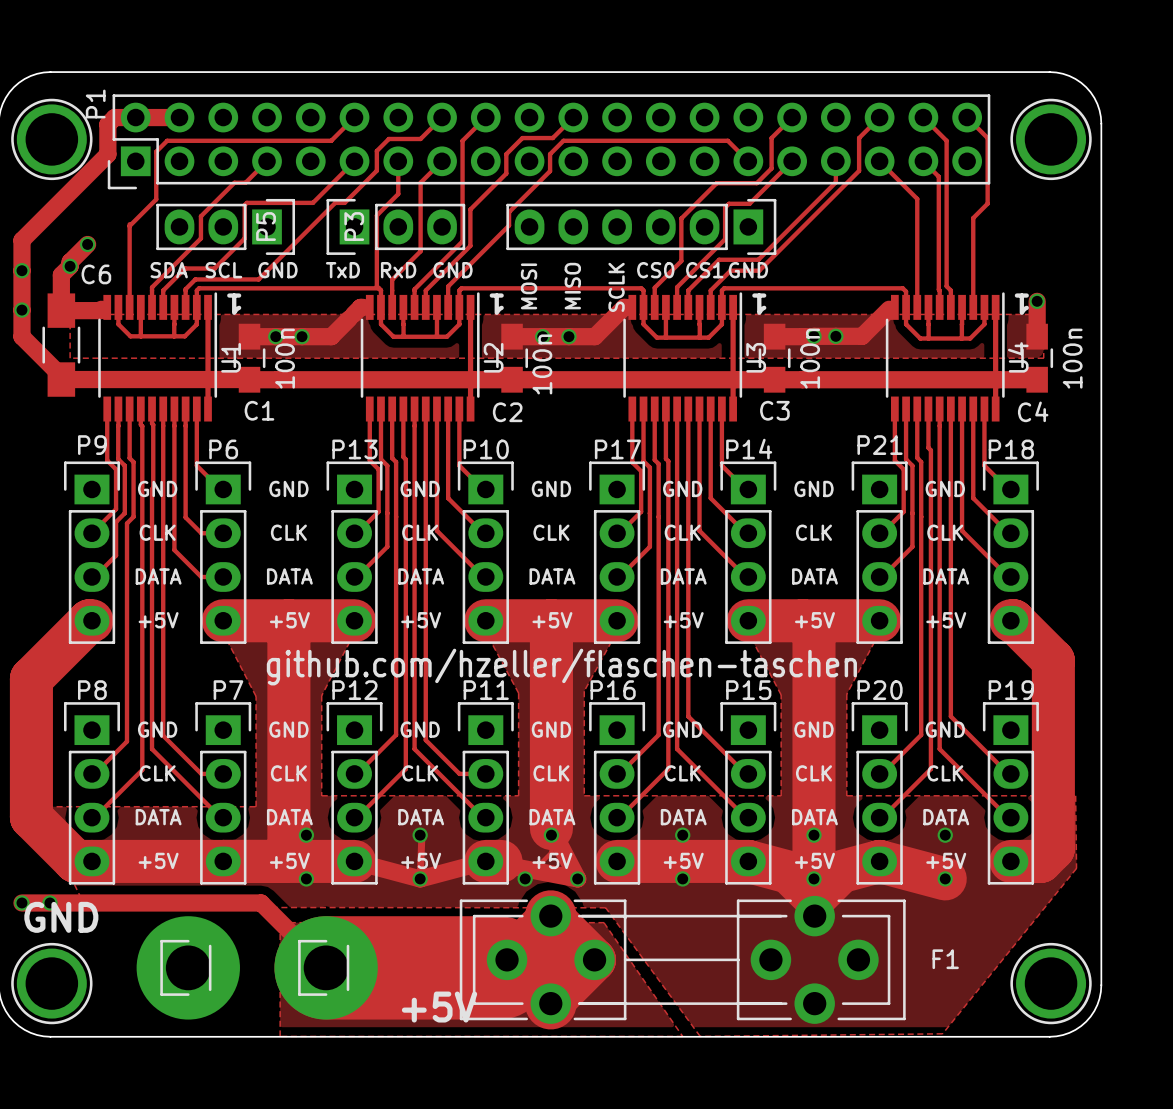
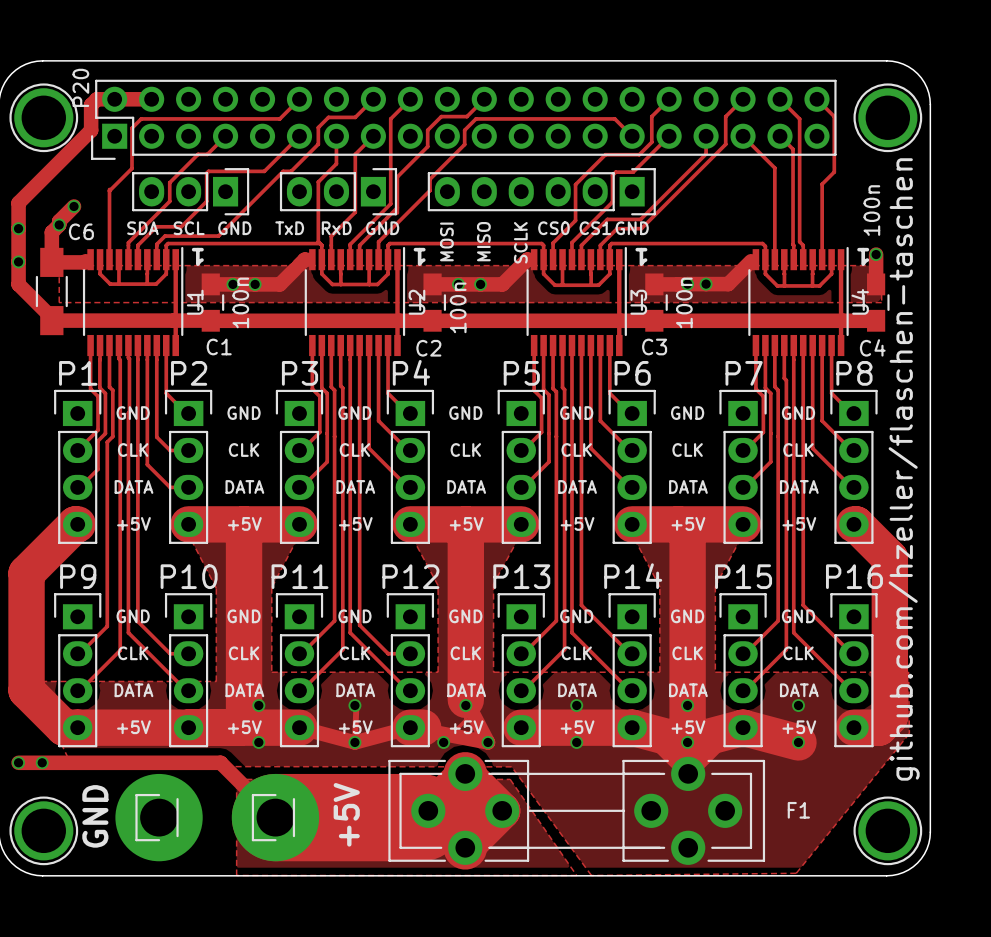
P1 name: P1 (95, 104) -> P20 (80, 87)
P3 name: P3 (354, 226) -> none
P5: (395, 226) -> none
part: none -> (338, 191)
C4 value position: 100n (1072, 358) -> 100n (871, 210)
P9 name: P9 (92, 445) -> P1 (78, 373)
P21 name: P21 (880, 445) -> P7 (744, 373)
P6 name: P6 (223, 449) -> P2 (189, 373)
P13 name: P13 (354, 449) -> P3 (300, 373)
P10 name: P10 (486, 449) -> P4 (411, 372)
P17 name: P17 (617, 449) -> P5 (521, 373)
P14 name: P14 (749, 449) -> P6 (632, 373)
P18 name: P18 (1011, 449) -> P8 (854, 373)
text: none -> github.com/hzeller/flaschen-taschen (904, 469)
text: github.com/hzeller/flaschen-taschen (561, 667) -> none
P8 name: P8 (92, 690) -> P9 (78, 576)
P7 name: P7 (228, 690) -> P10 (189, 576)
P12 name: P12 (354, 690) -> P11 (300, 576)
P11 name: P11 (486, 690) -> P12 (410, 576)
P16 name: P16 (613, 690) -> P13 (521, 576)
P15 name: P15 (748, 690) -> P14 (633, 576)
P20 name: P20 (880, 690) -> P15 (743, 576)
P19 name: P19 (1011, 690) -> P16 (854, 576)
text rotation: 0° (61, 917) -> 90° counterclockwise (95, 816)
text rotation: 0° (439, 1007) -> 90° counterclockwise (346, 814)

